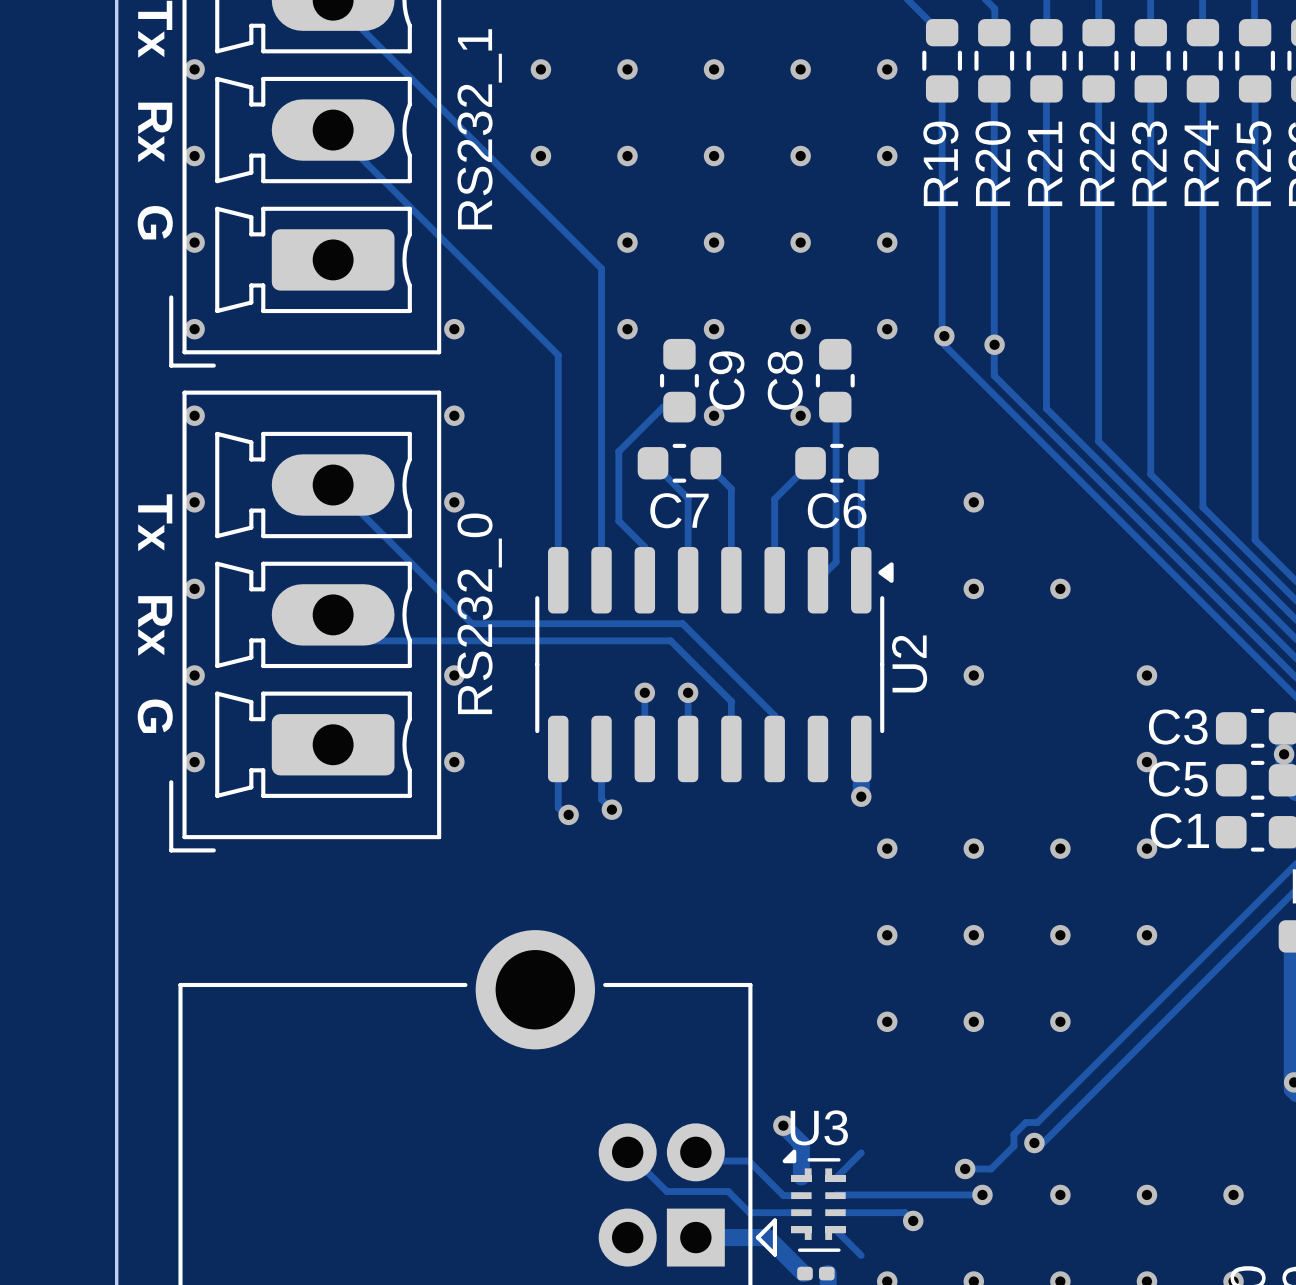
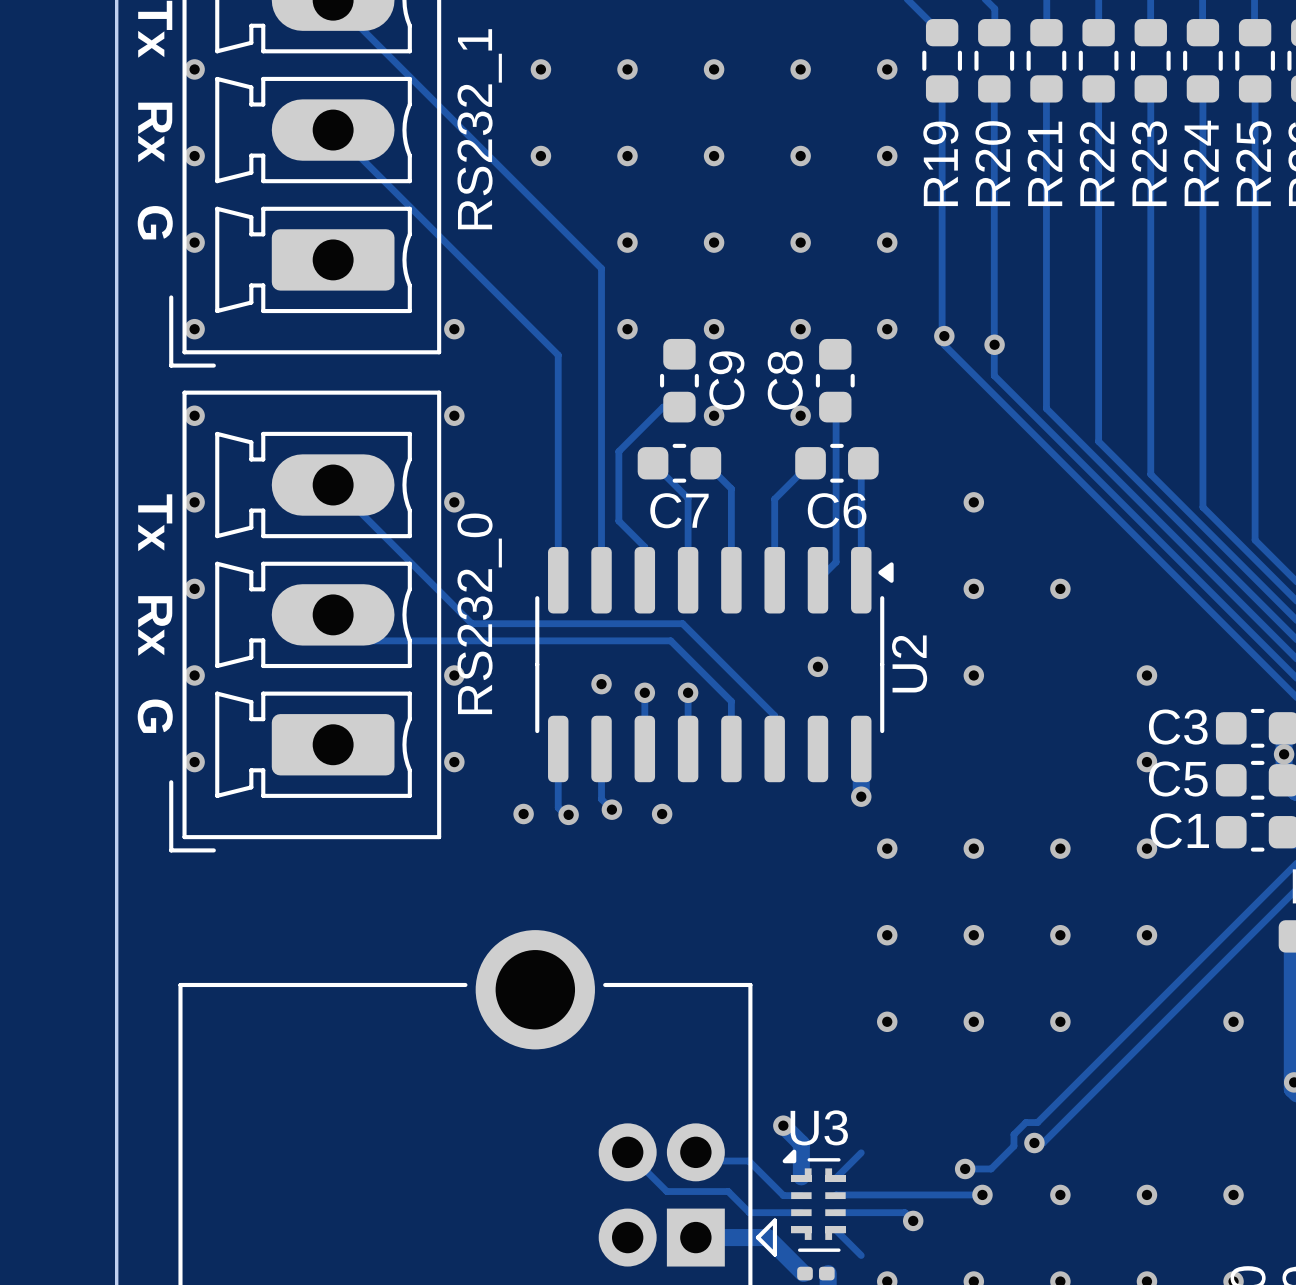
via: none -> (817, 666)
via: none -> (601, 684)
via: none -> (523, 814)
via: none -> (662, 814)
via: none -> (1233, 1021)

